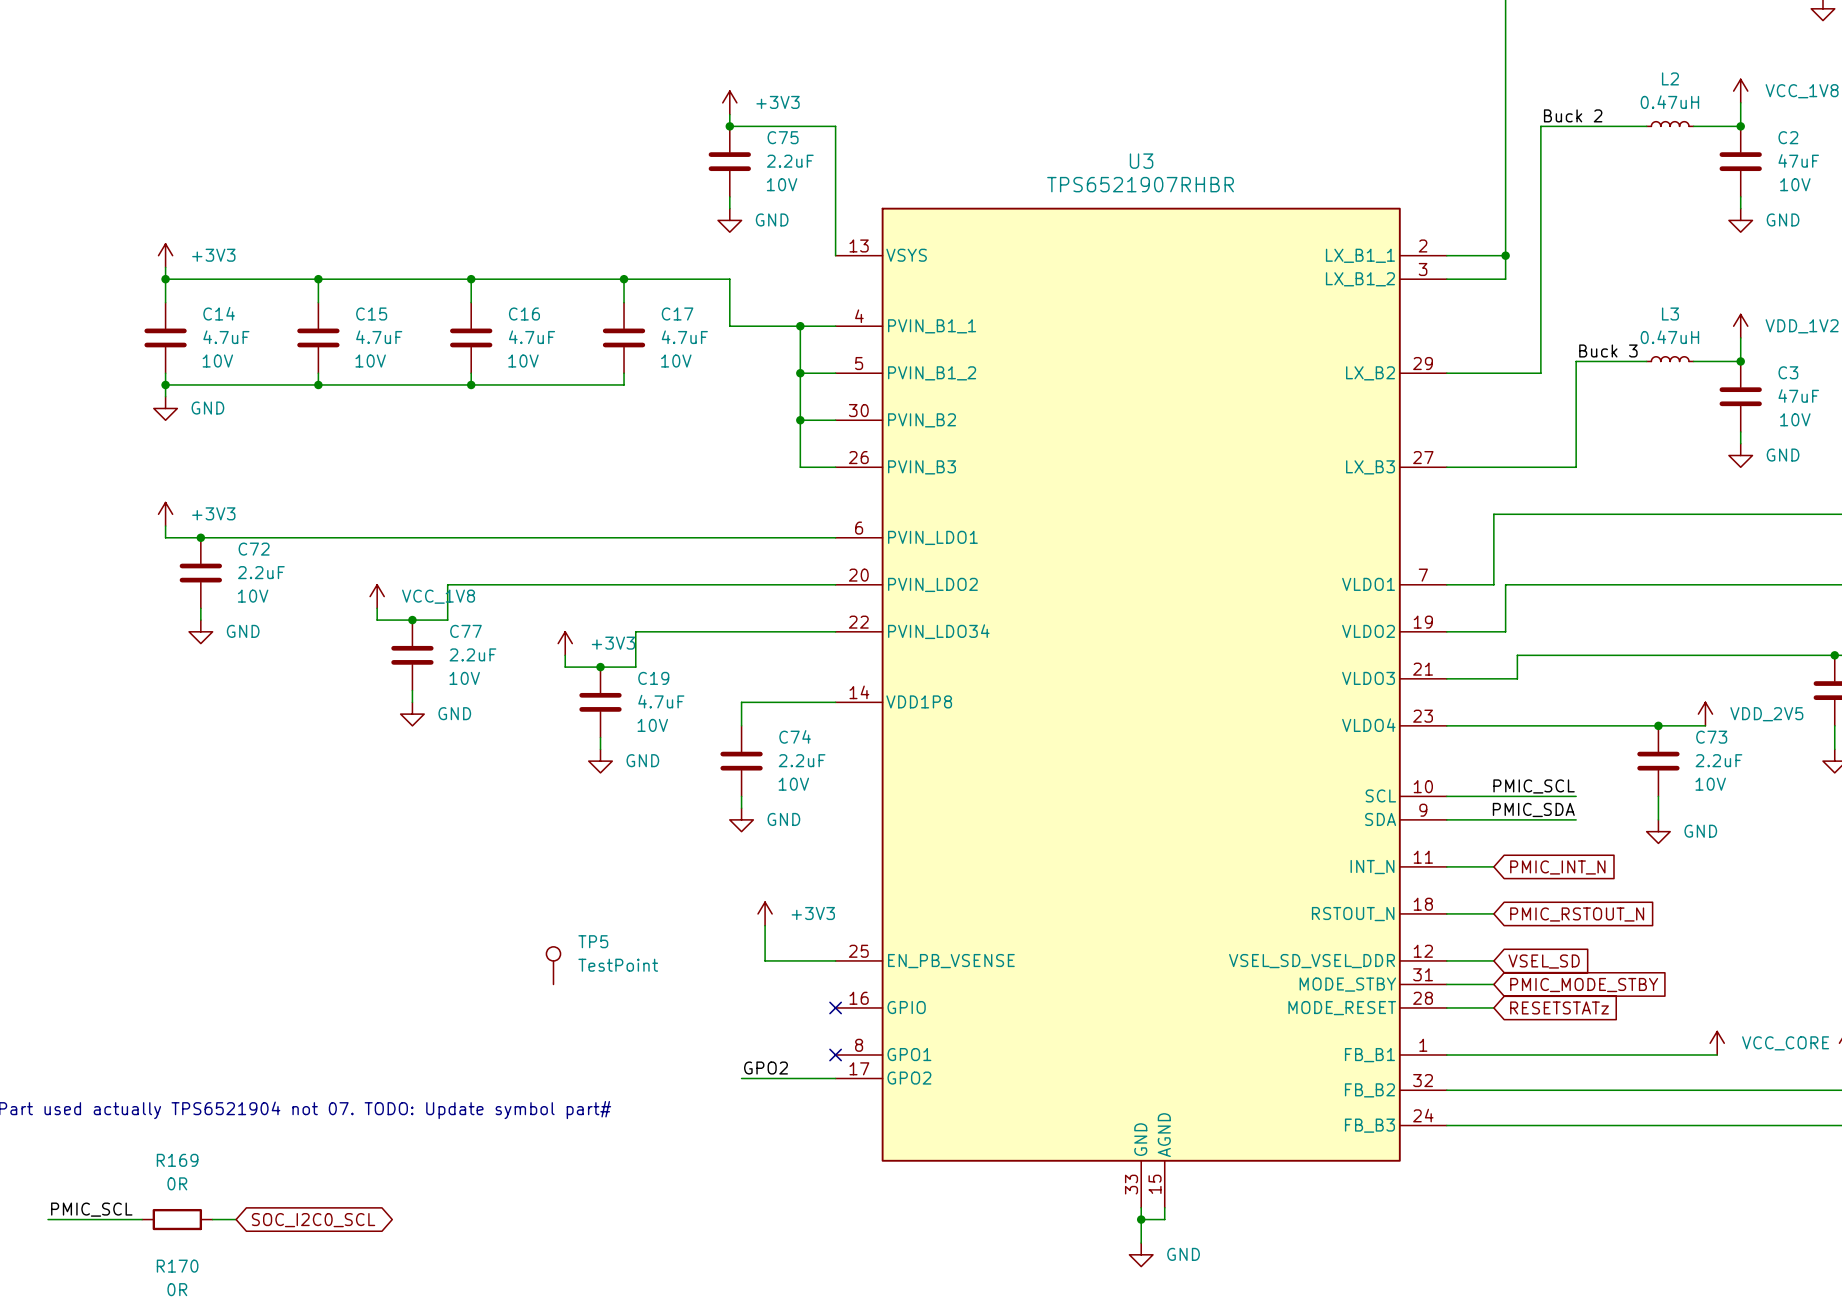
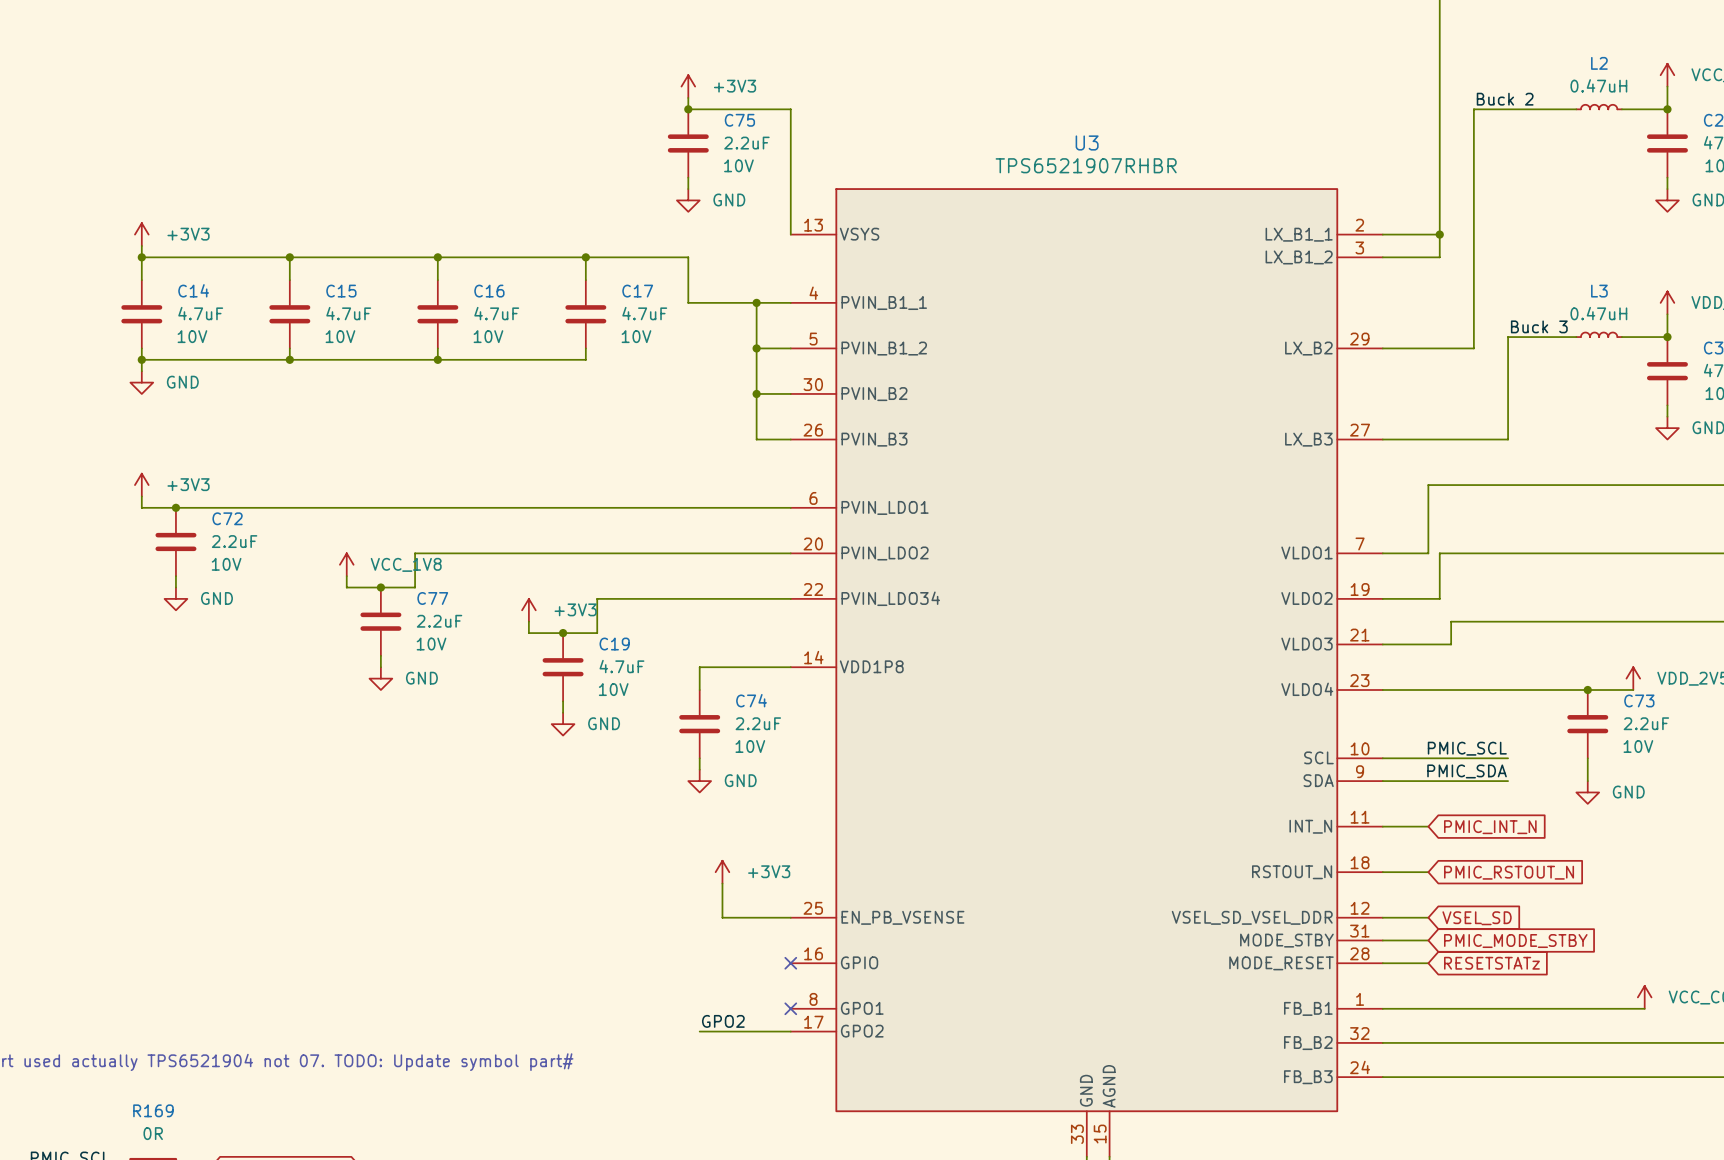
TP5: TestPoint (553, 965) -> none

